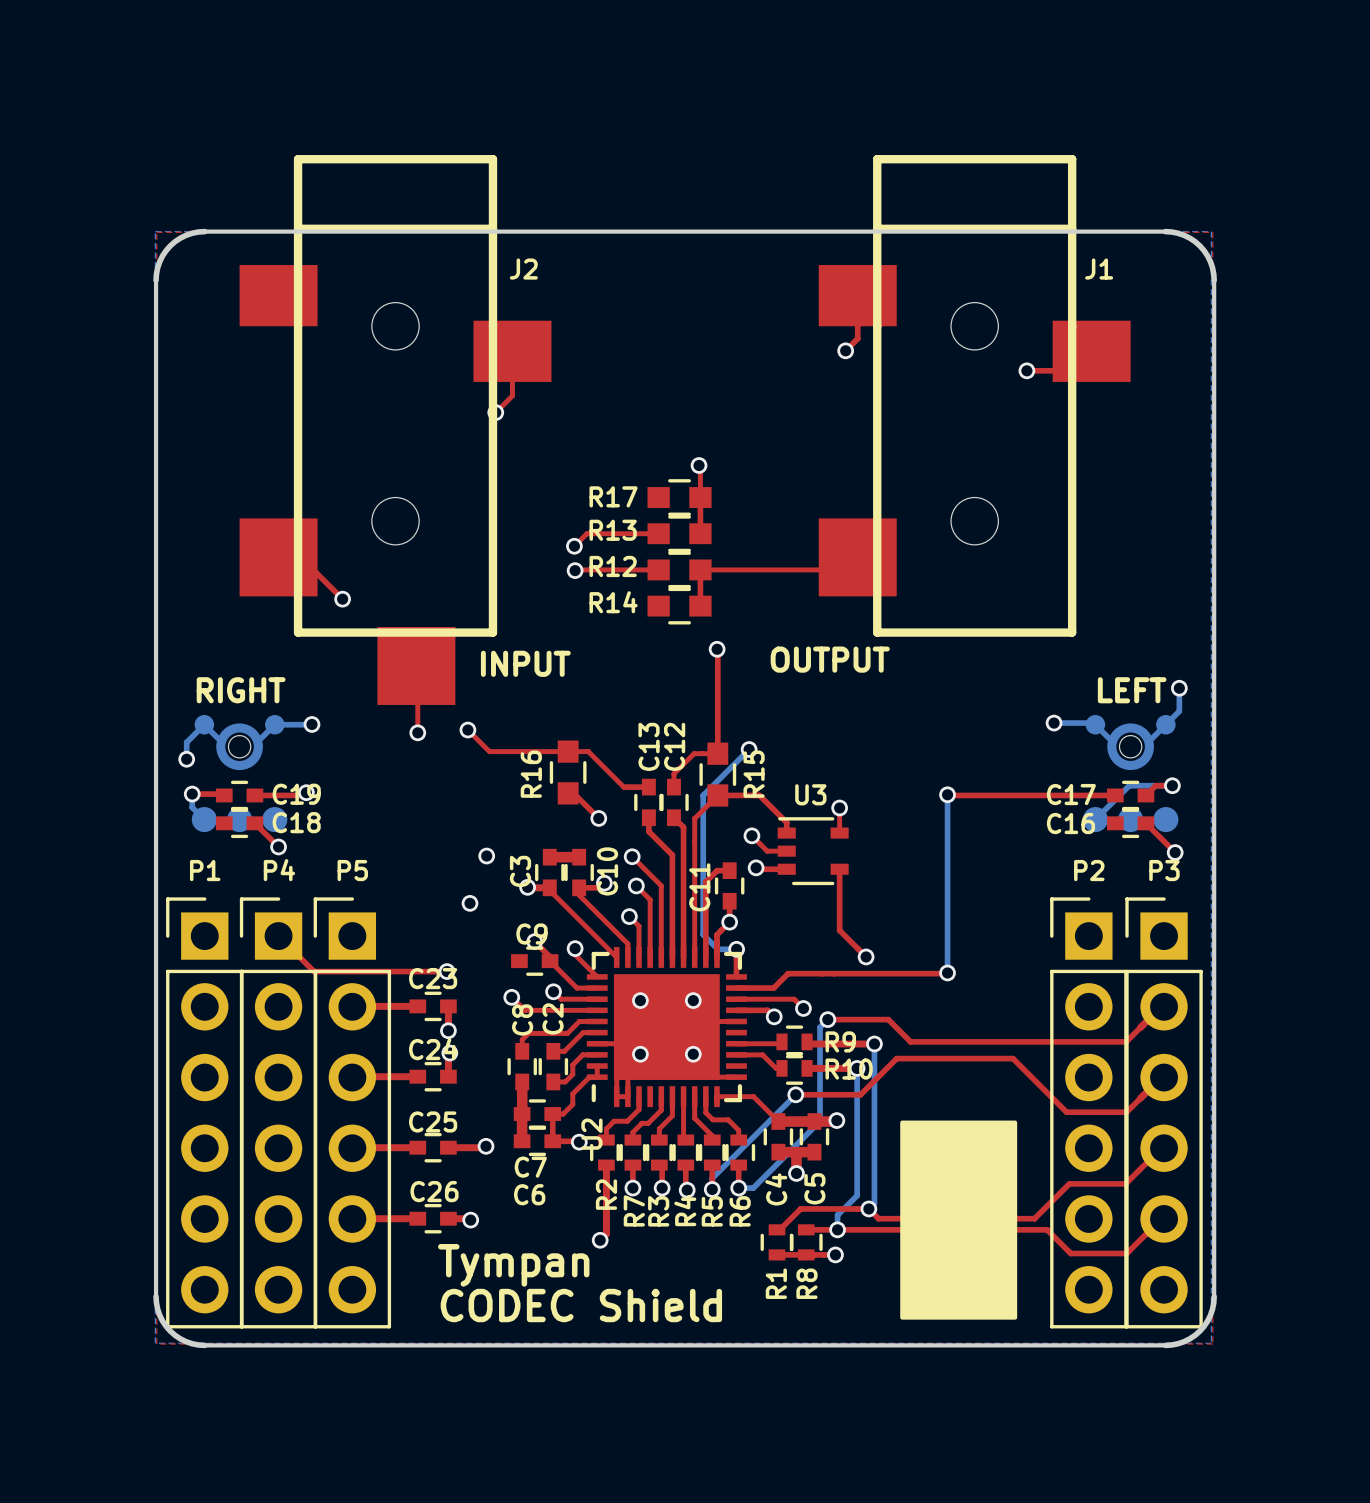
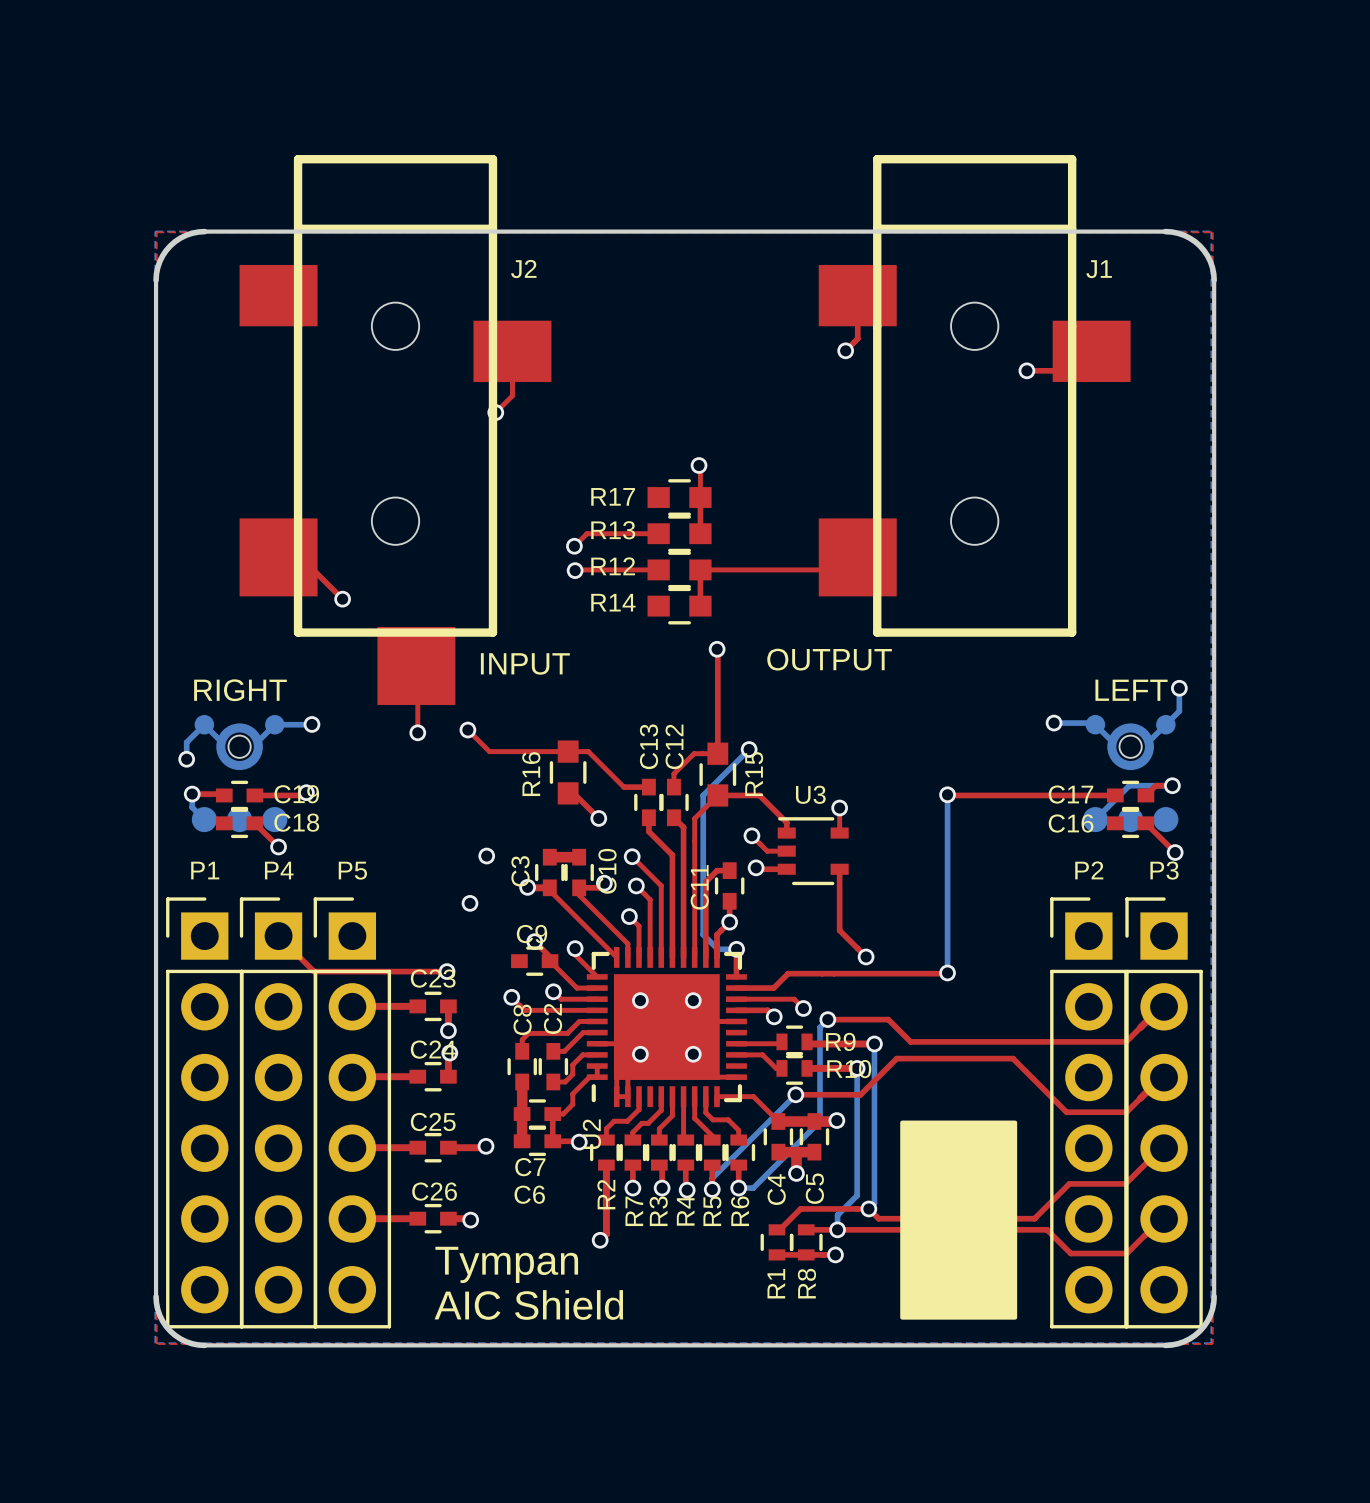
text: CODEC Shield (581, 1305) -> AIC Shield (528, 1304)

